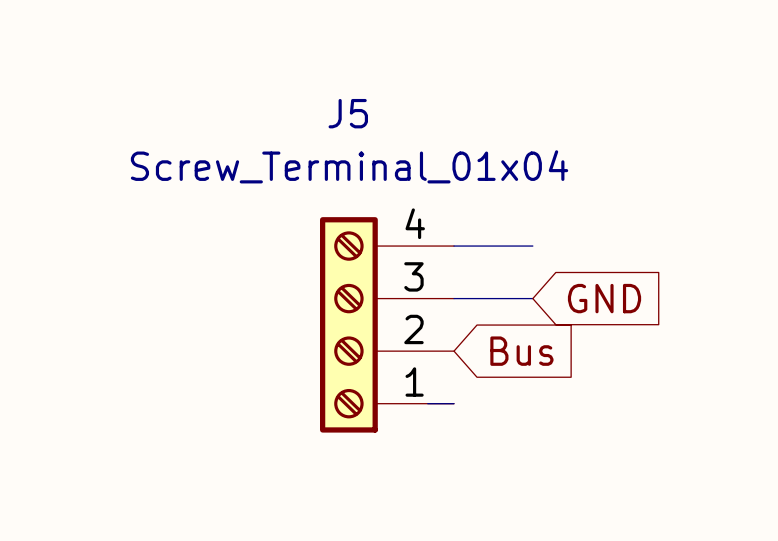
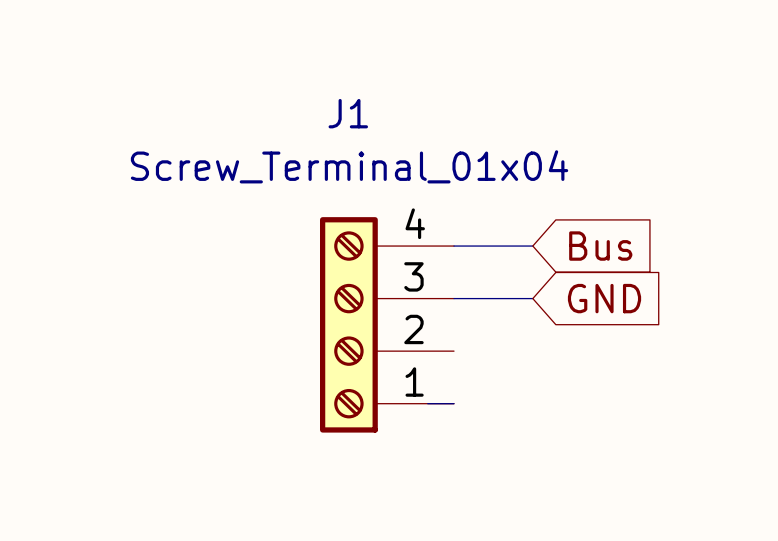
J5 name: J5 (348, 113) -> J1 (348, 113)
global label position: Bus (521, 351) -> Bus (600, 246)

